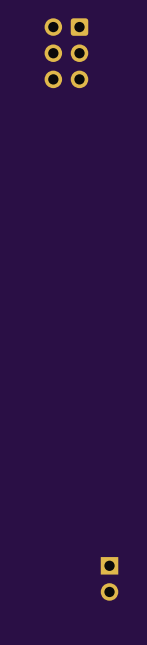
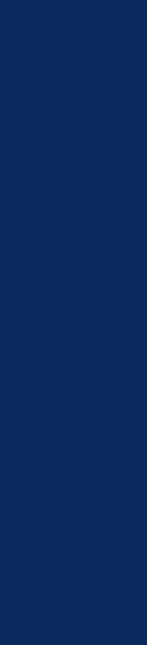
part: (66, 53) -> none
part: (109, 578) -> none

